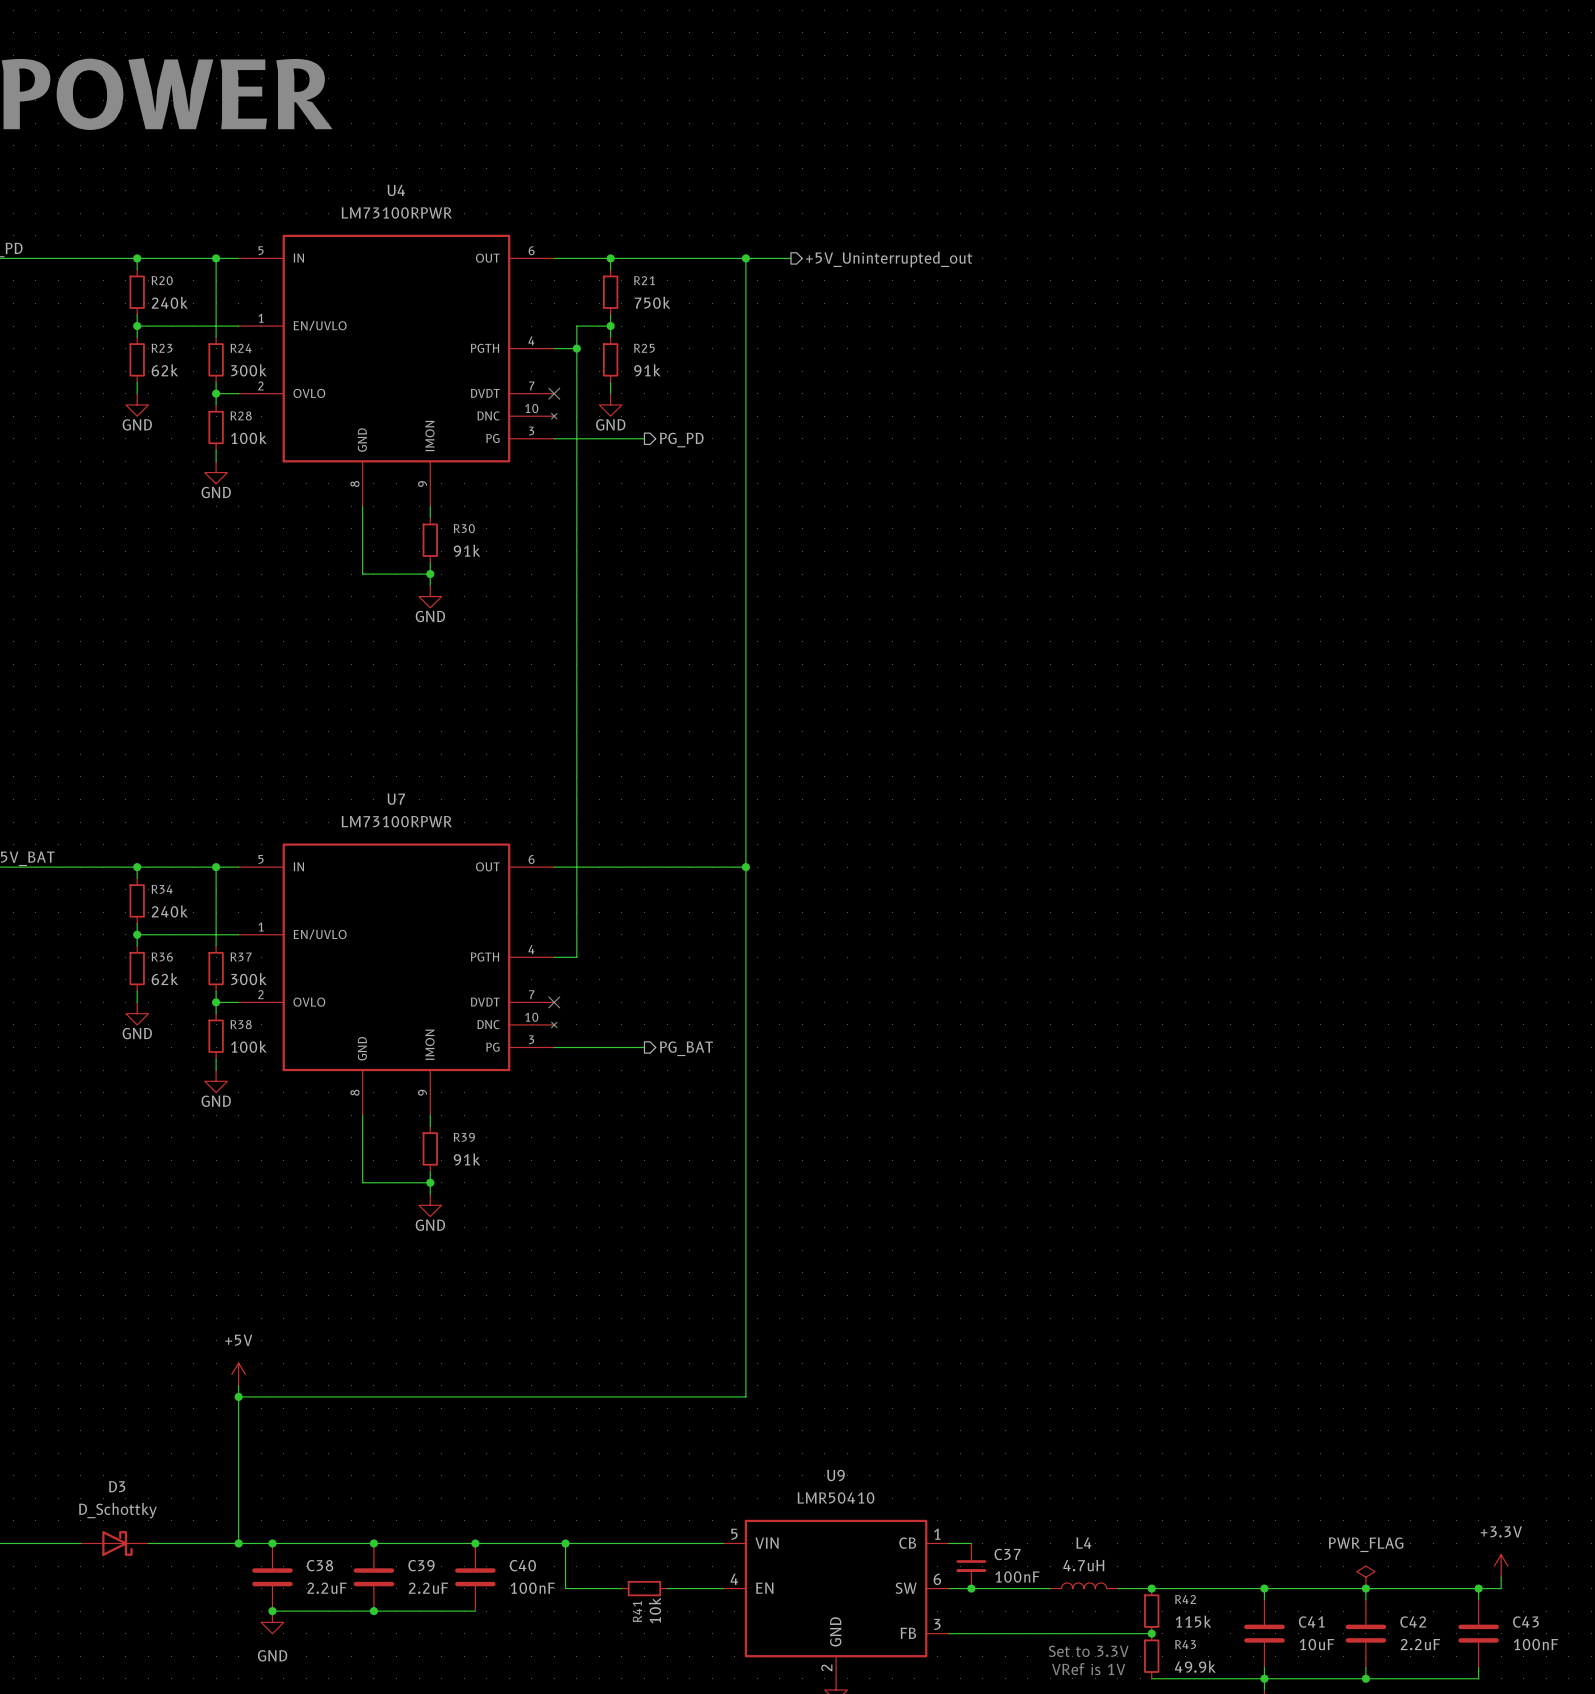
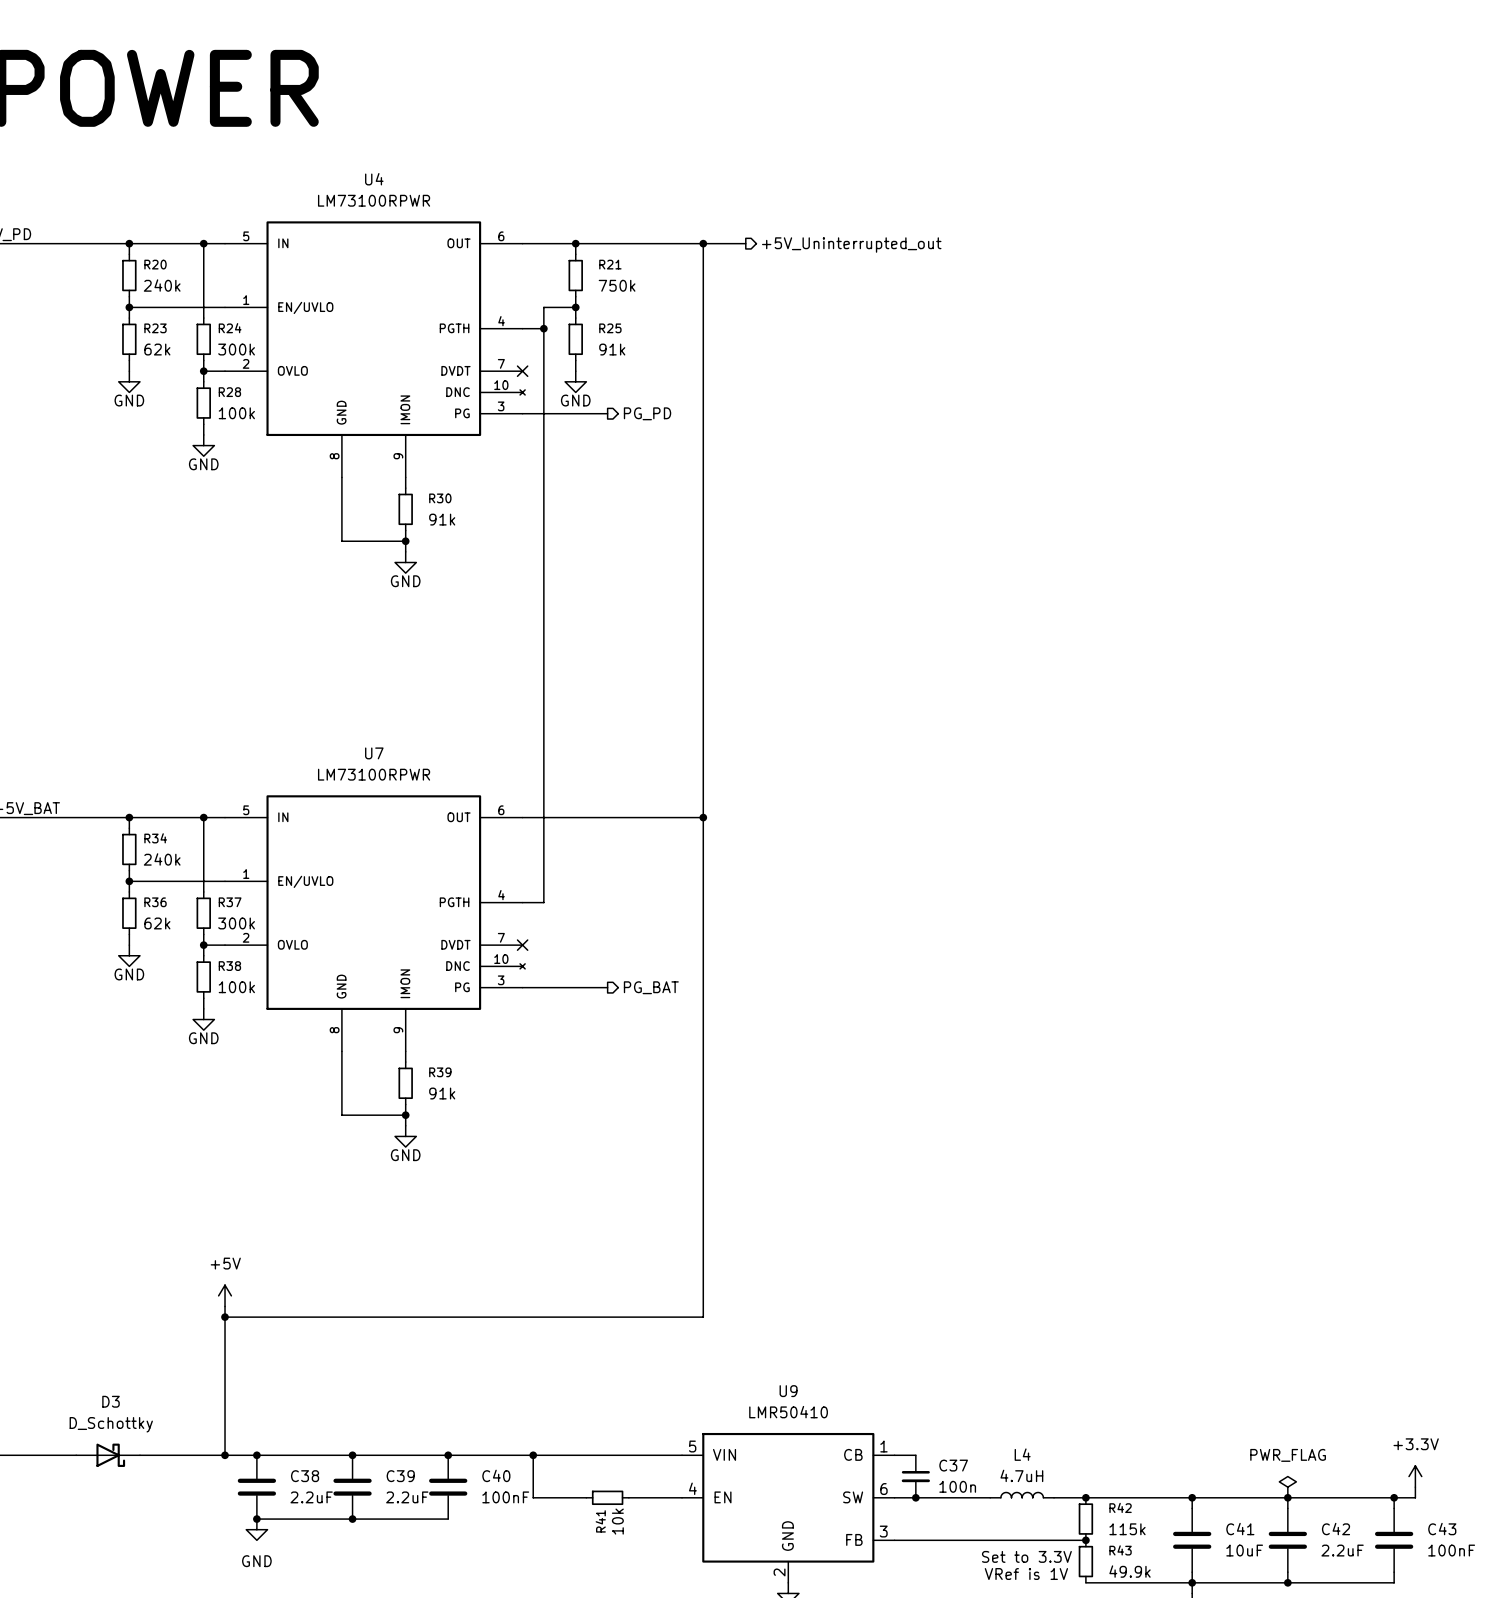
C37 value: 100nF (1017, 1576) -> 100n (957, 1486)

